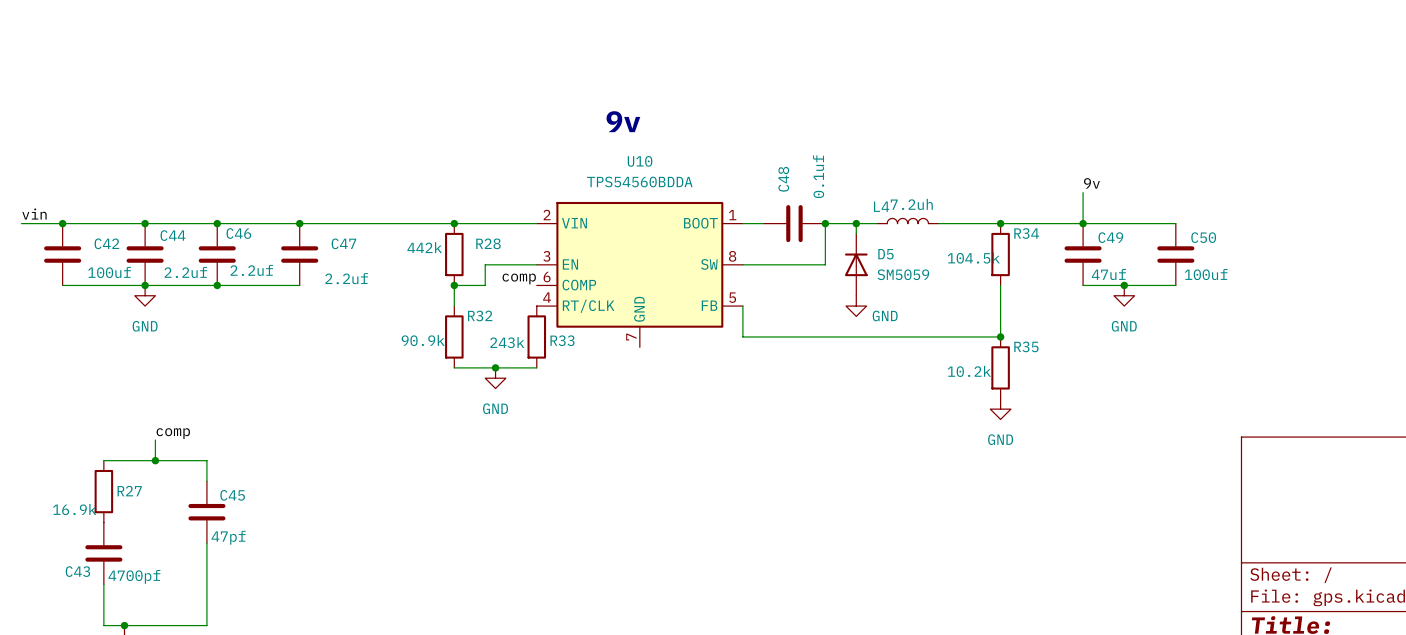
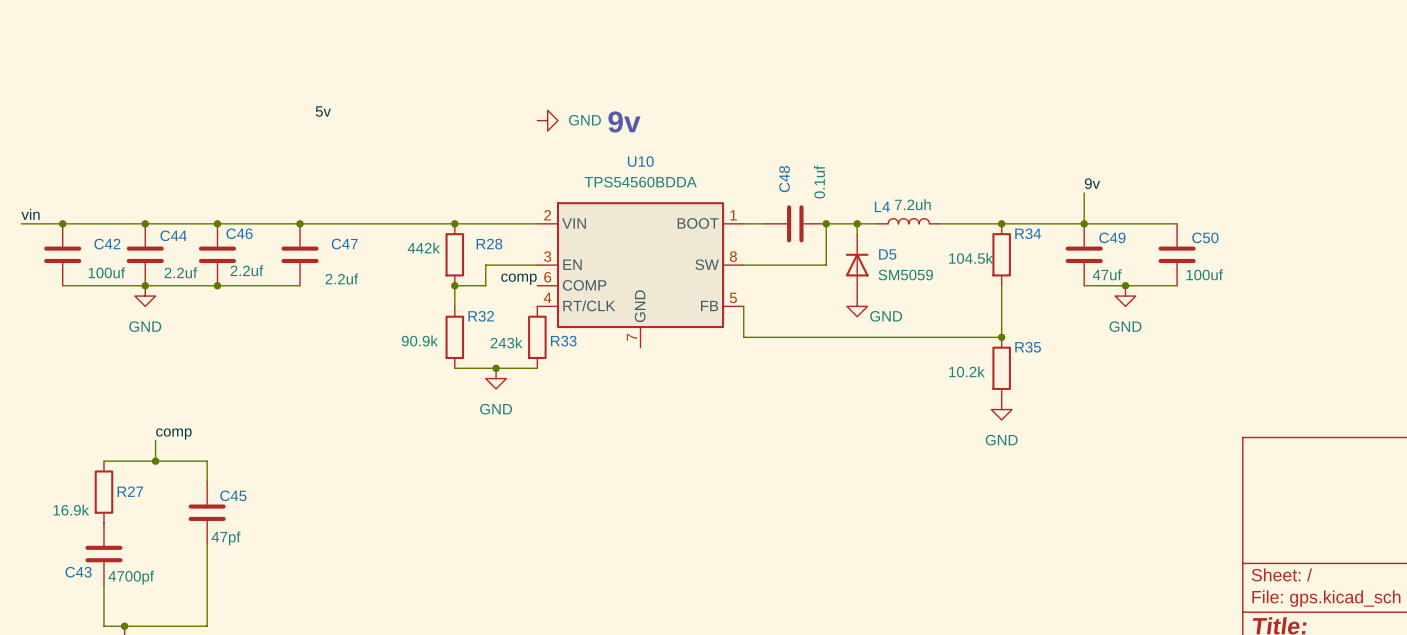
label: none -> 5v (323, 111)
power symbol: none -> GND (547, 120)

